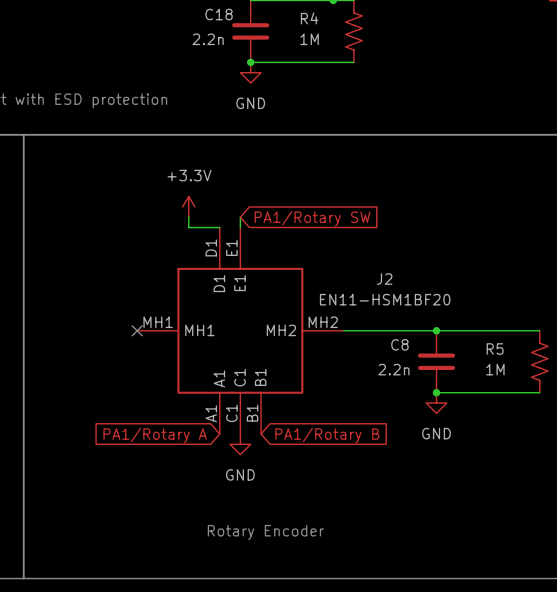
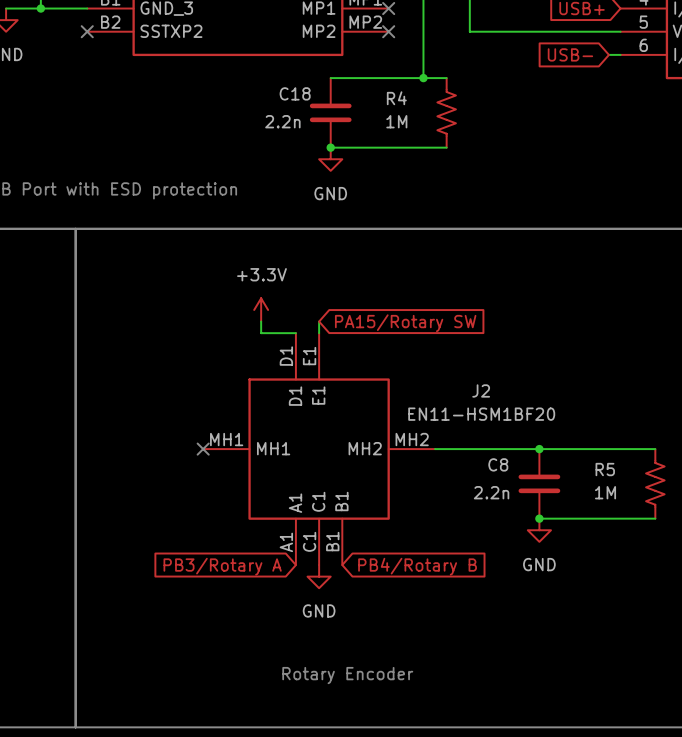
global label: PA1/Rotary SW (312, 218) -> PA15/Rotary SW (405, 323)
global label: PA1/Rotary A (155, 435) -> PB3/Rotary A (222, 566)
global label: PA1/Rotary B (327, 435) -> PB4/Rotary B (417, 566)

